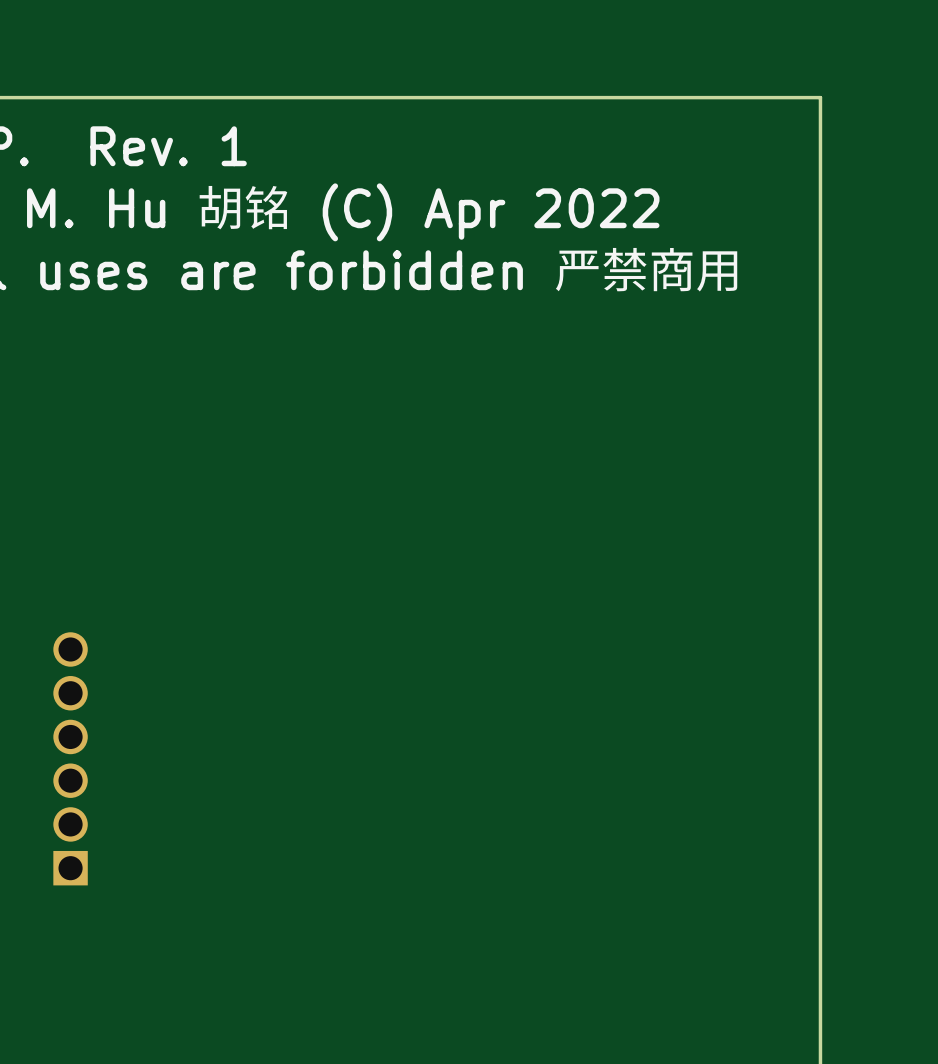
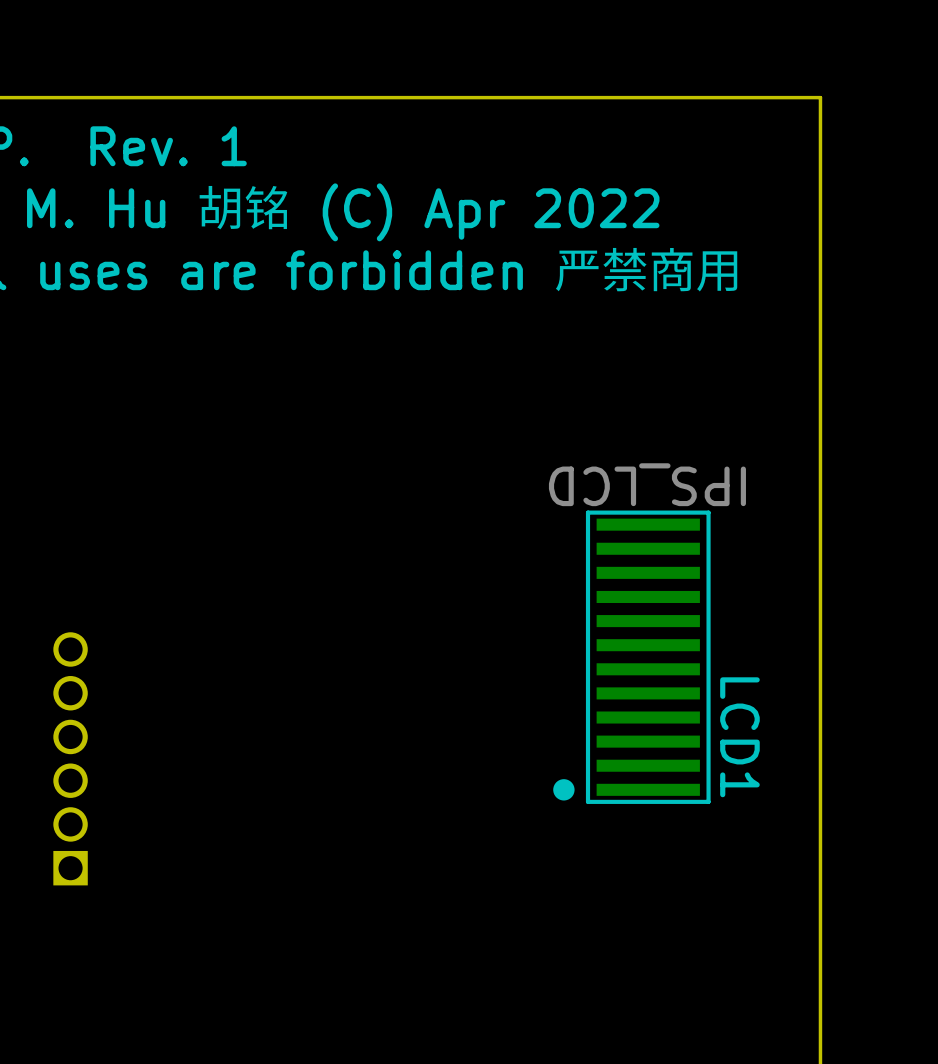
LCD1: none -> IPS_LCD (631, 657)

